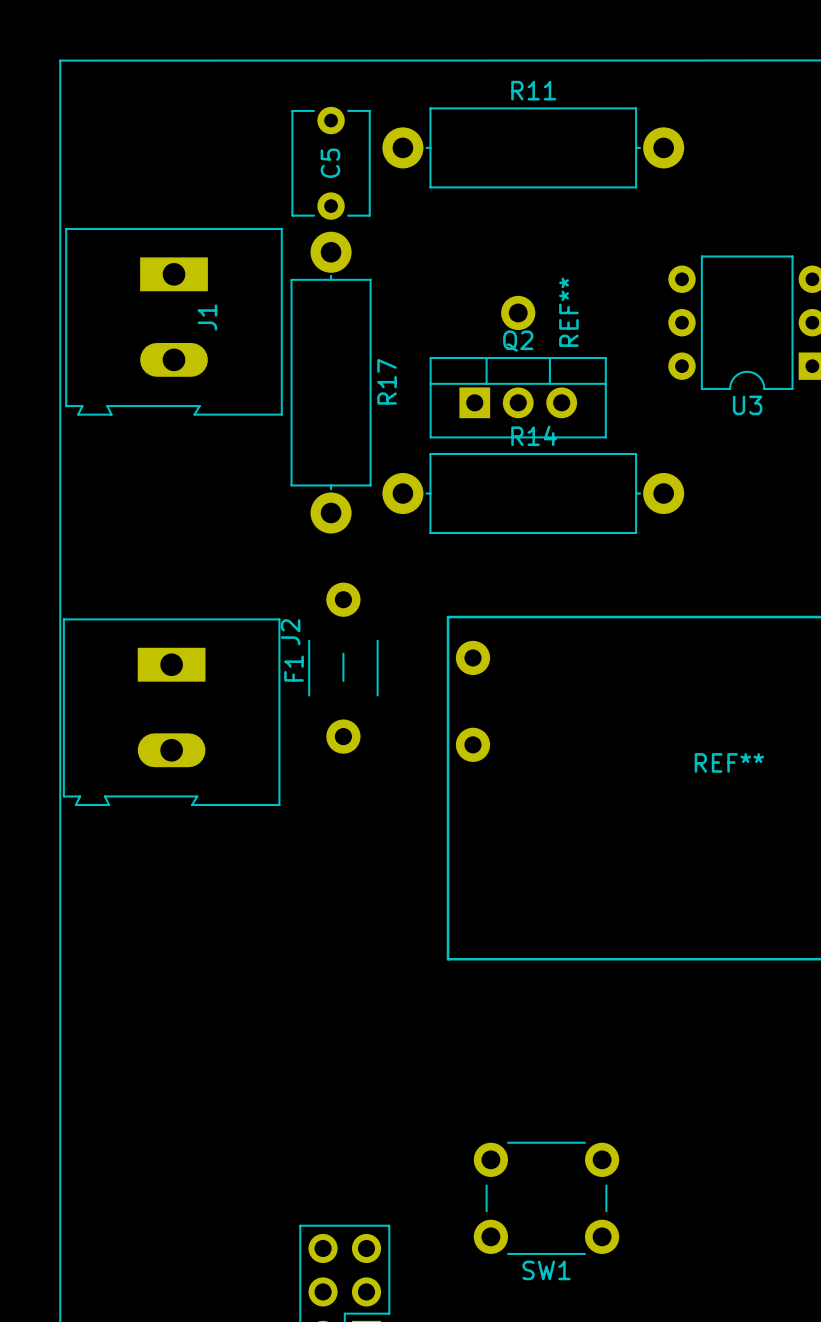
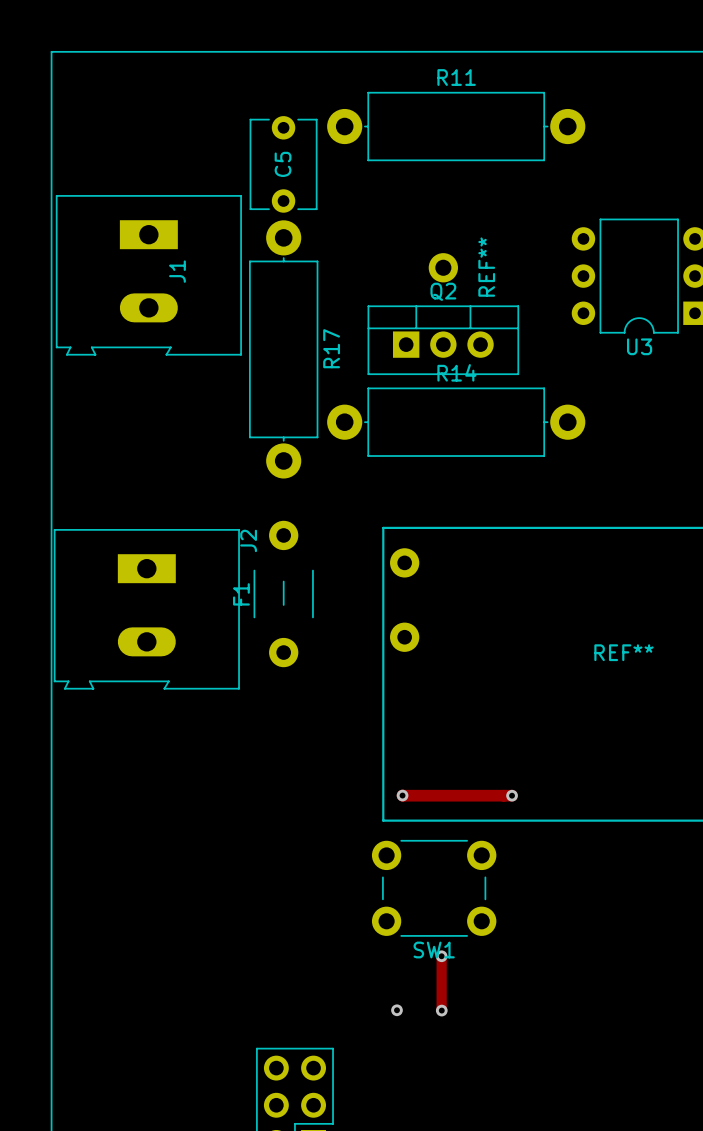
C5 position: (331, 163) -> (283, 164)
R17 position: (331, 382) -> (283, 349)
F1 position: (343, 668) -> (283, 594)
via: none -> (402, 795)
track: none -> (402, 795) (512, 795)
via: none -> (512, 795)
track: none -> (441, 956) (441, 1010)
via: none -> (441, 956)
via: none -> (396, 1010)
via: none -> (441, 1010)
SW1 position: (546, 1198) -> (434, 888)

